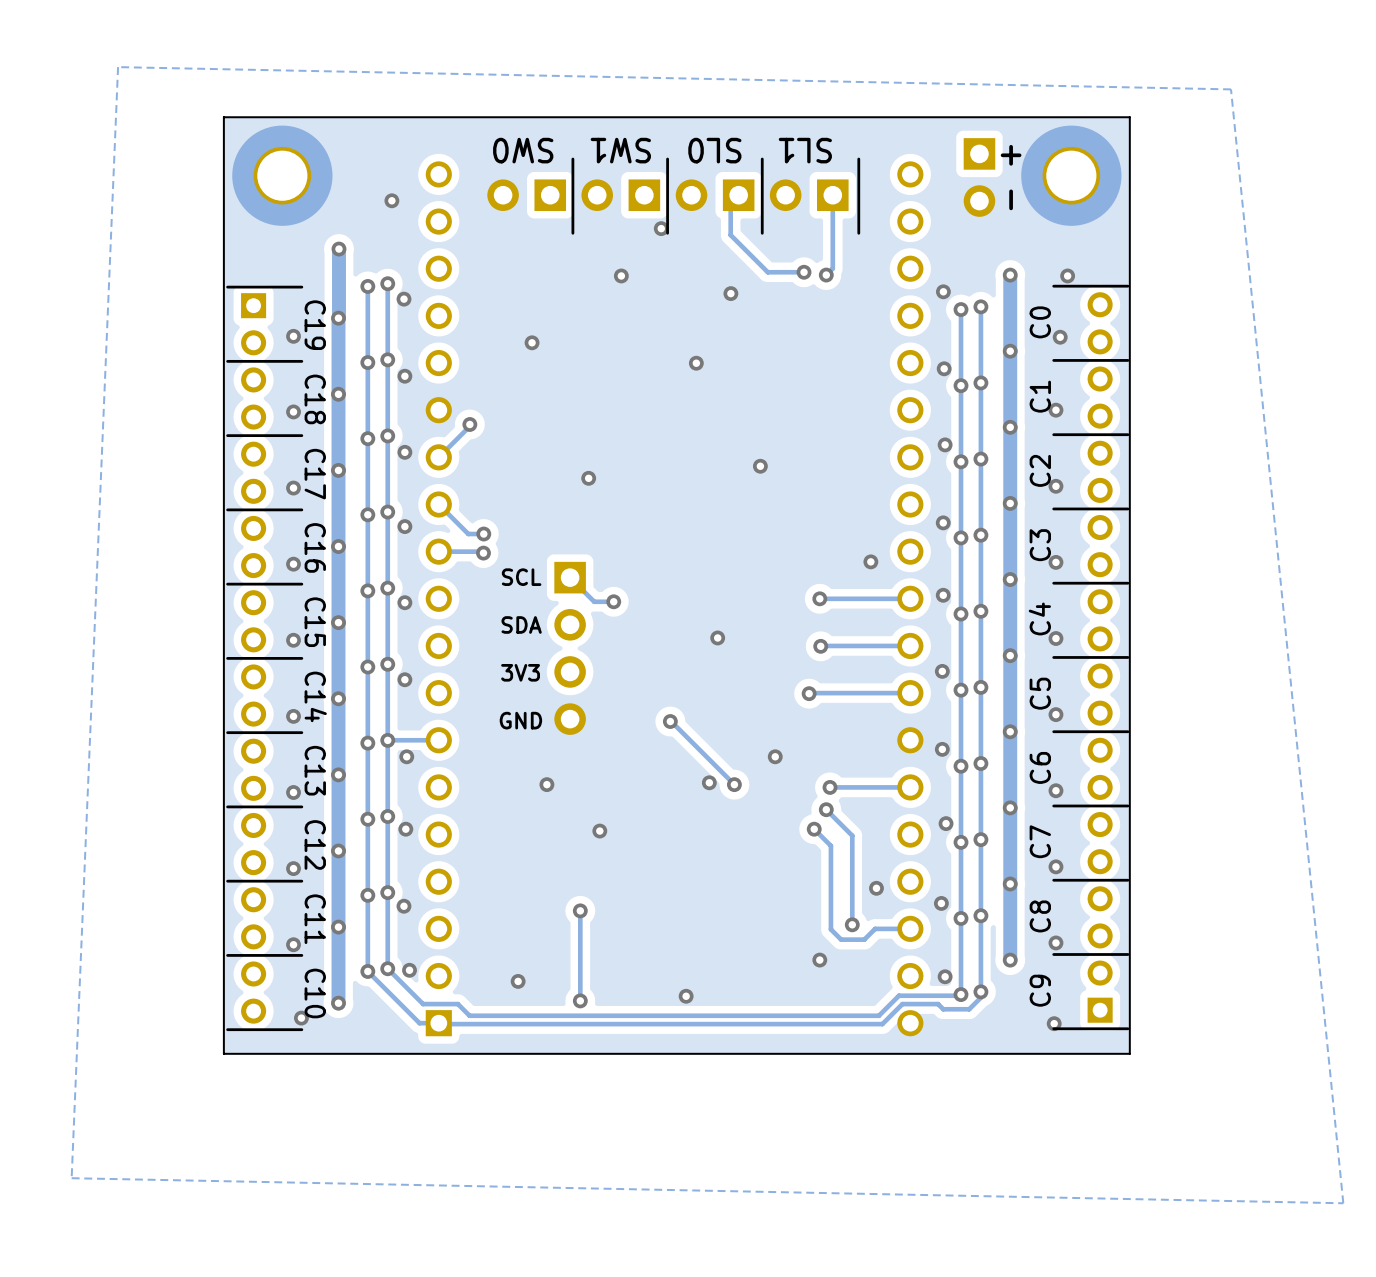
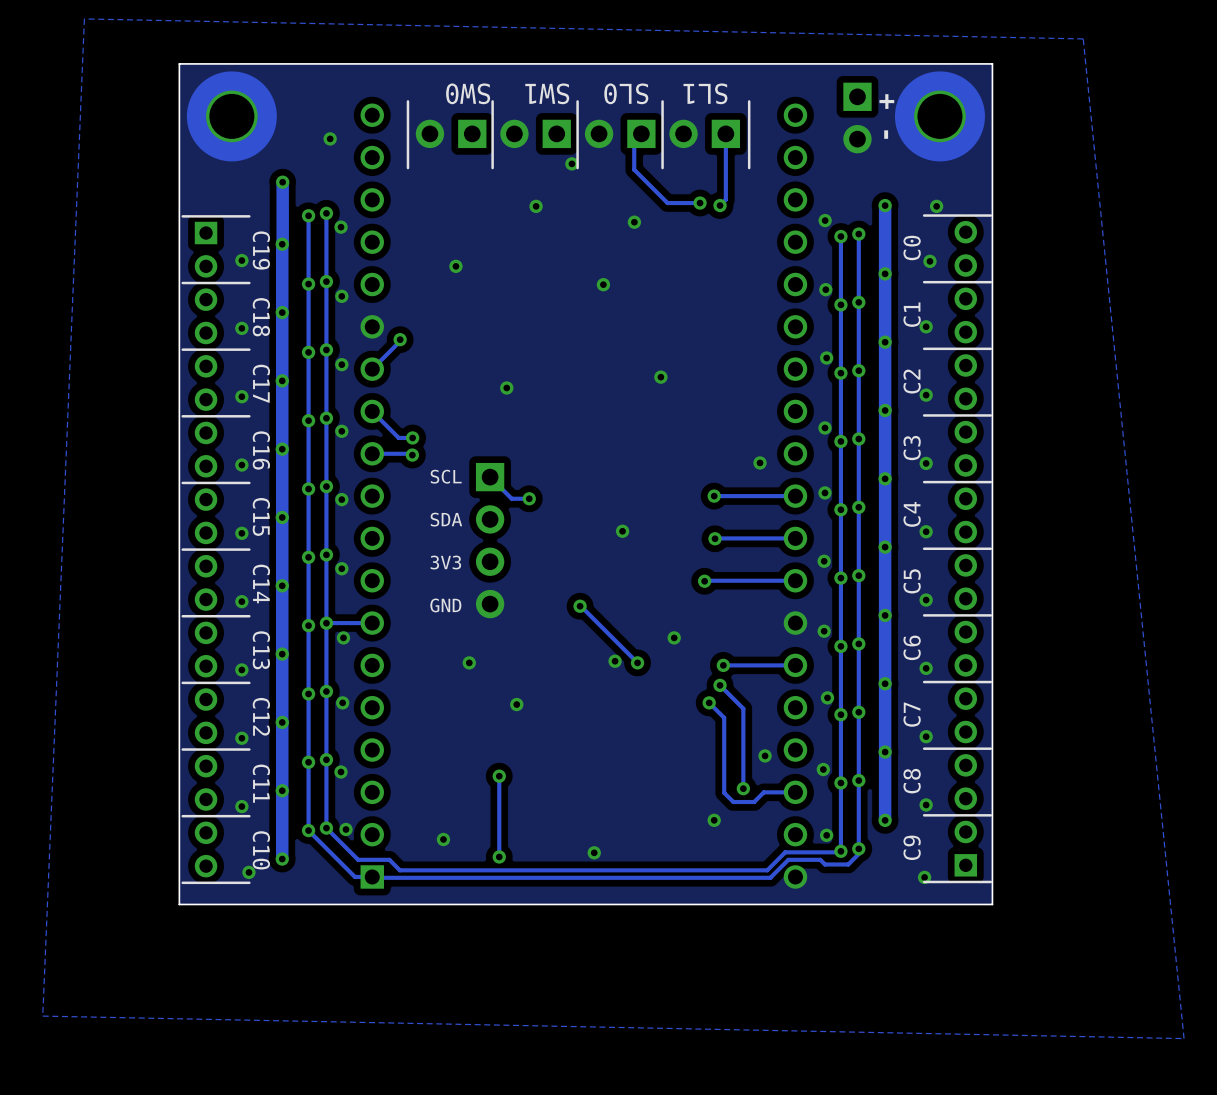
line: none -> (407, 101) (407, 168)

